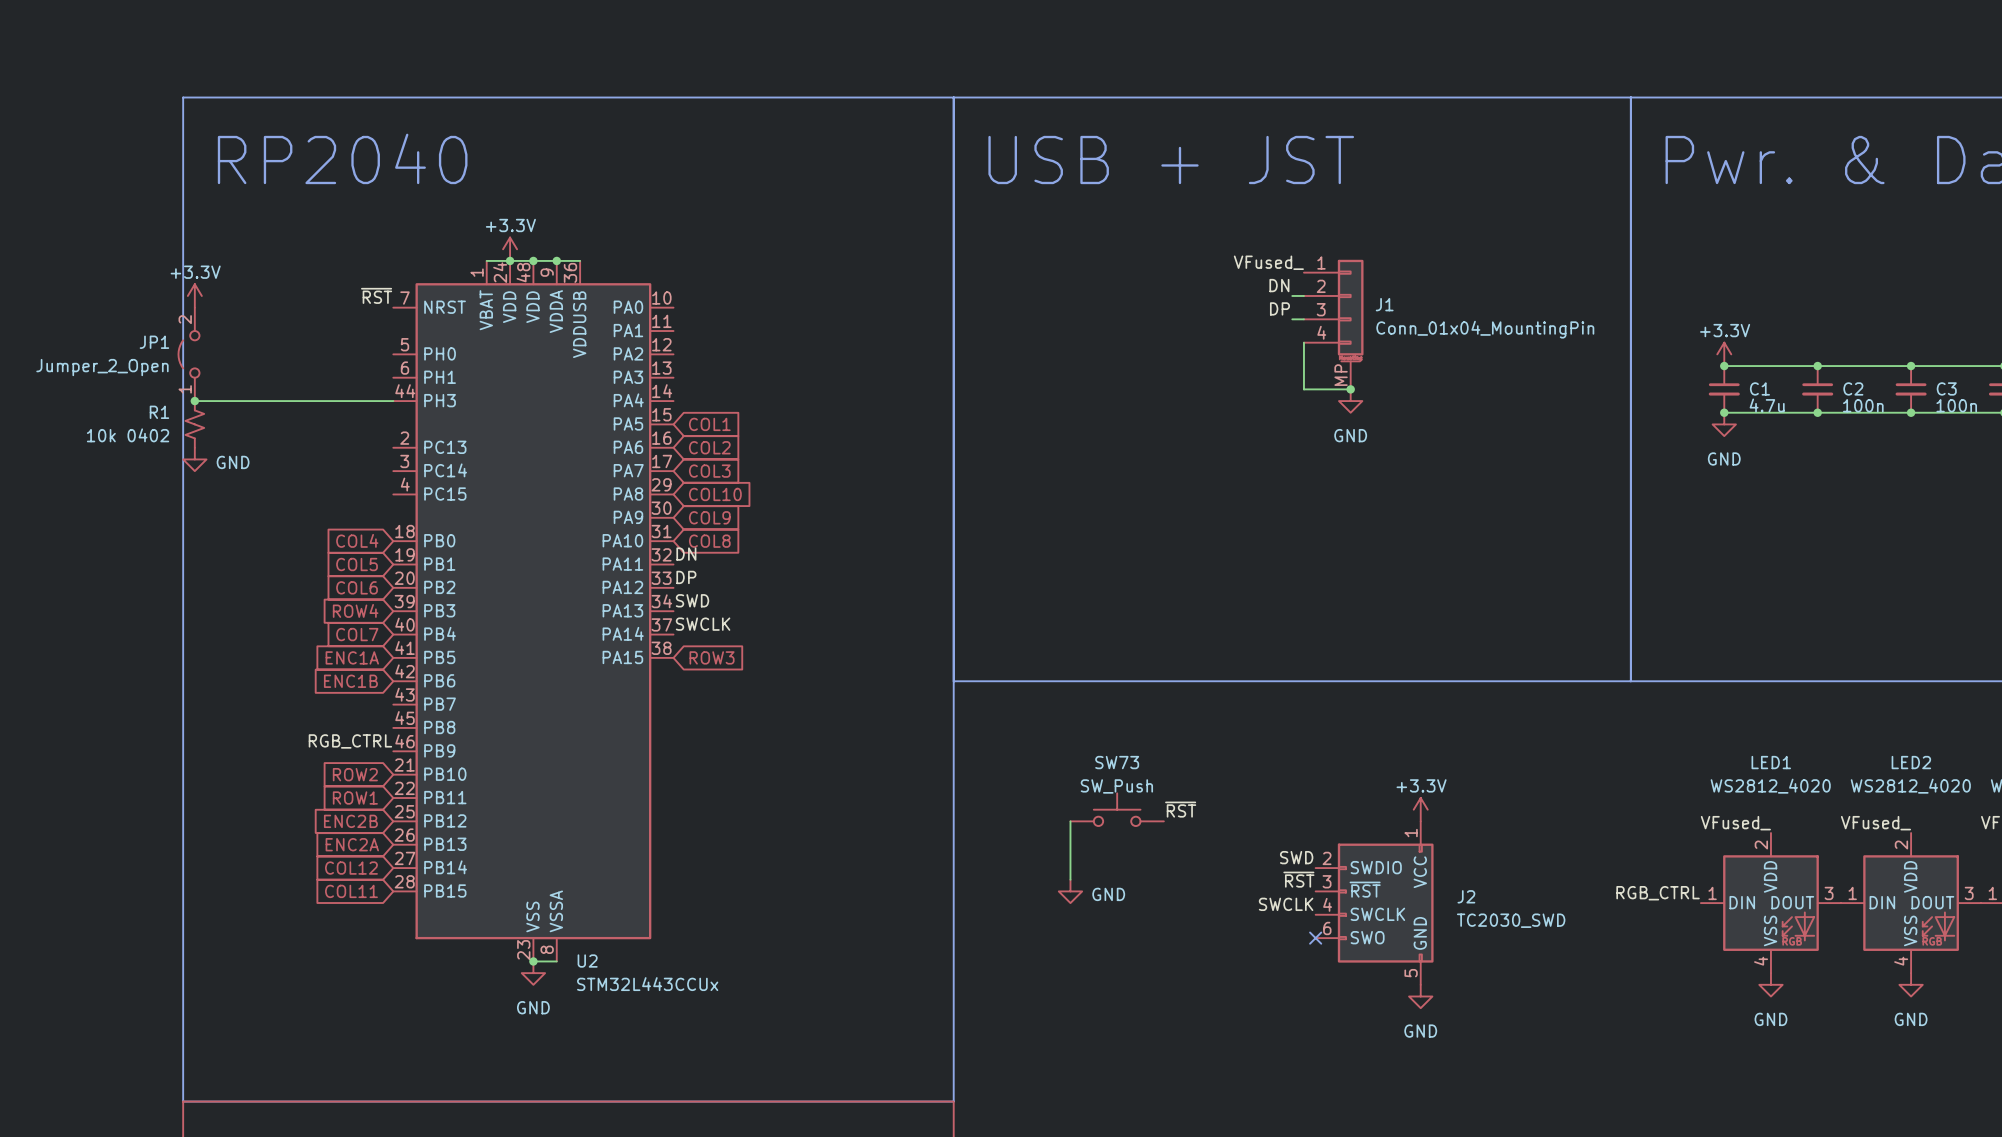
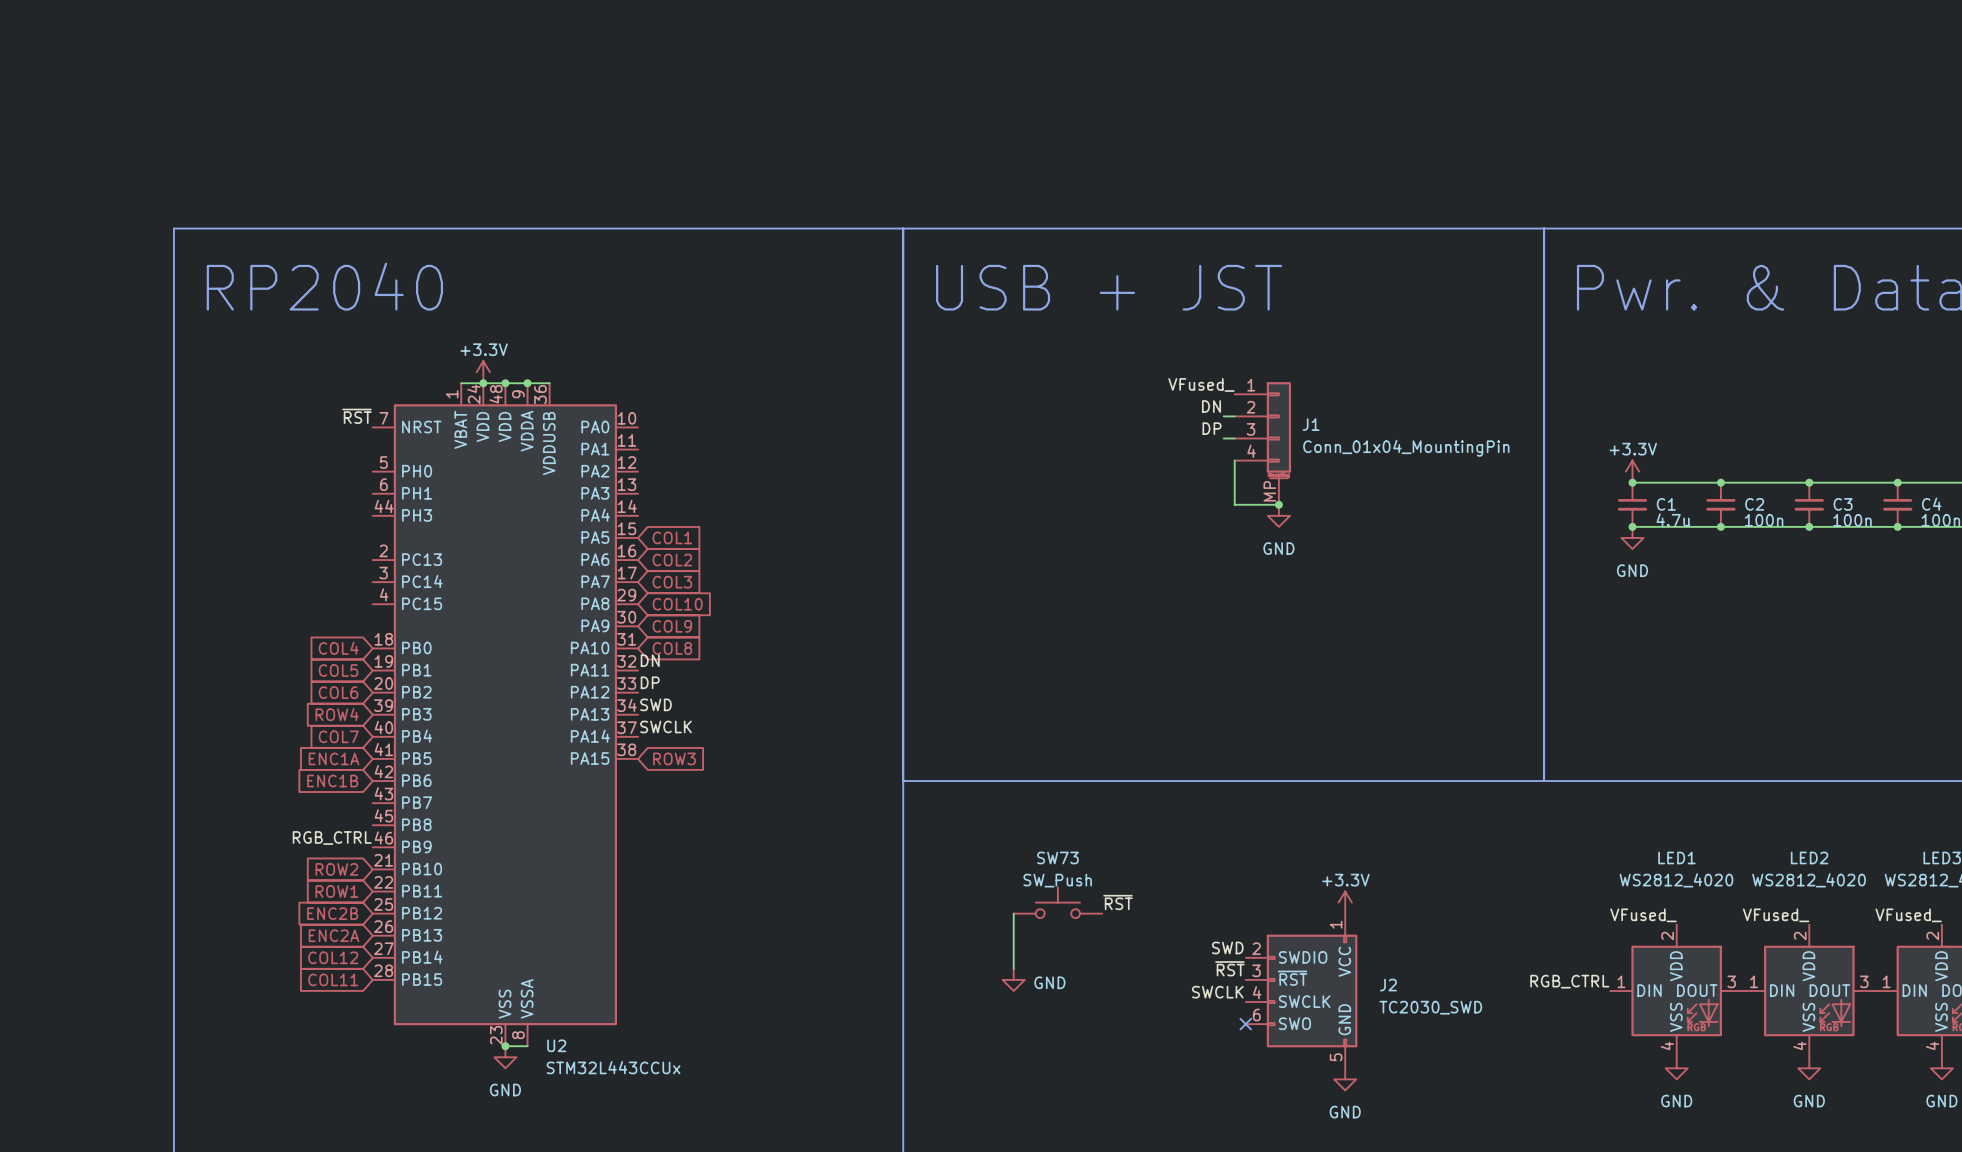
power symbol: +3.3V (194, 295) -> none
JP1: Jumper_2_Open (189, 354) -> none
wire: (194, 401) (393, 401) -> none
junction: (194, 401) -> none
R1: 10k 0402 (194, 424) -> none
power symbol: GND (194, 459) -> none

